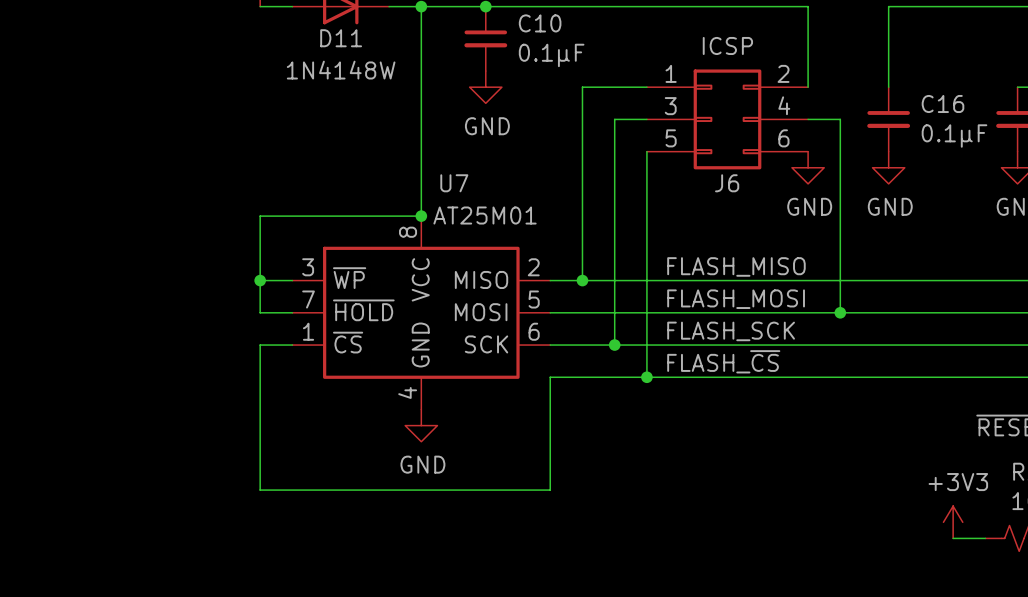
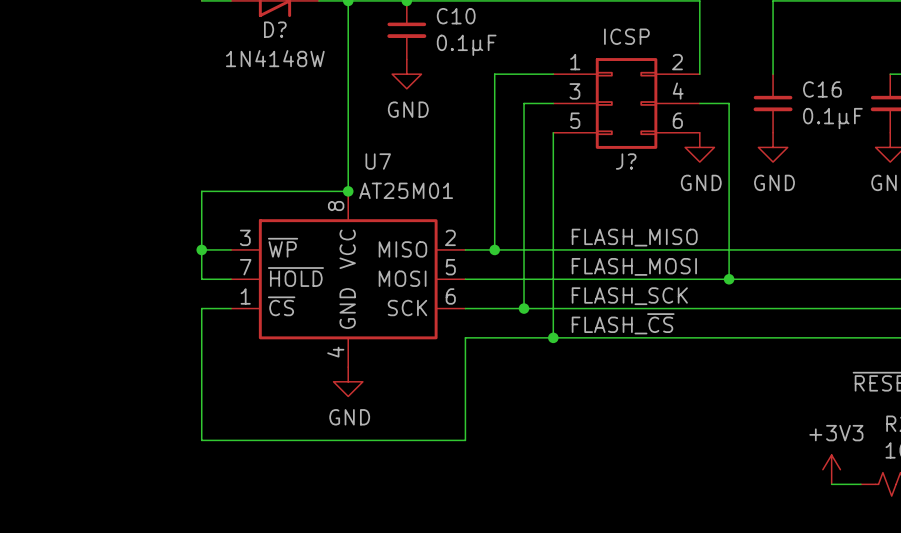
D11 name: D11 (341, 38) -> D? (275, 29)
J6 name: J6 (727, 183) -> J? (626, 161)

